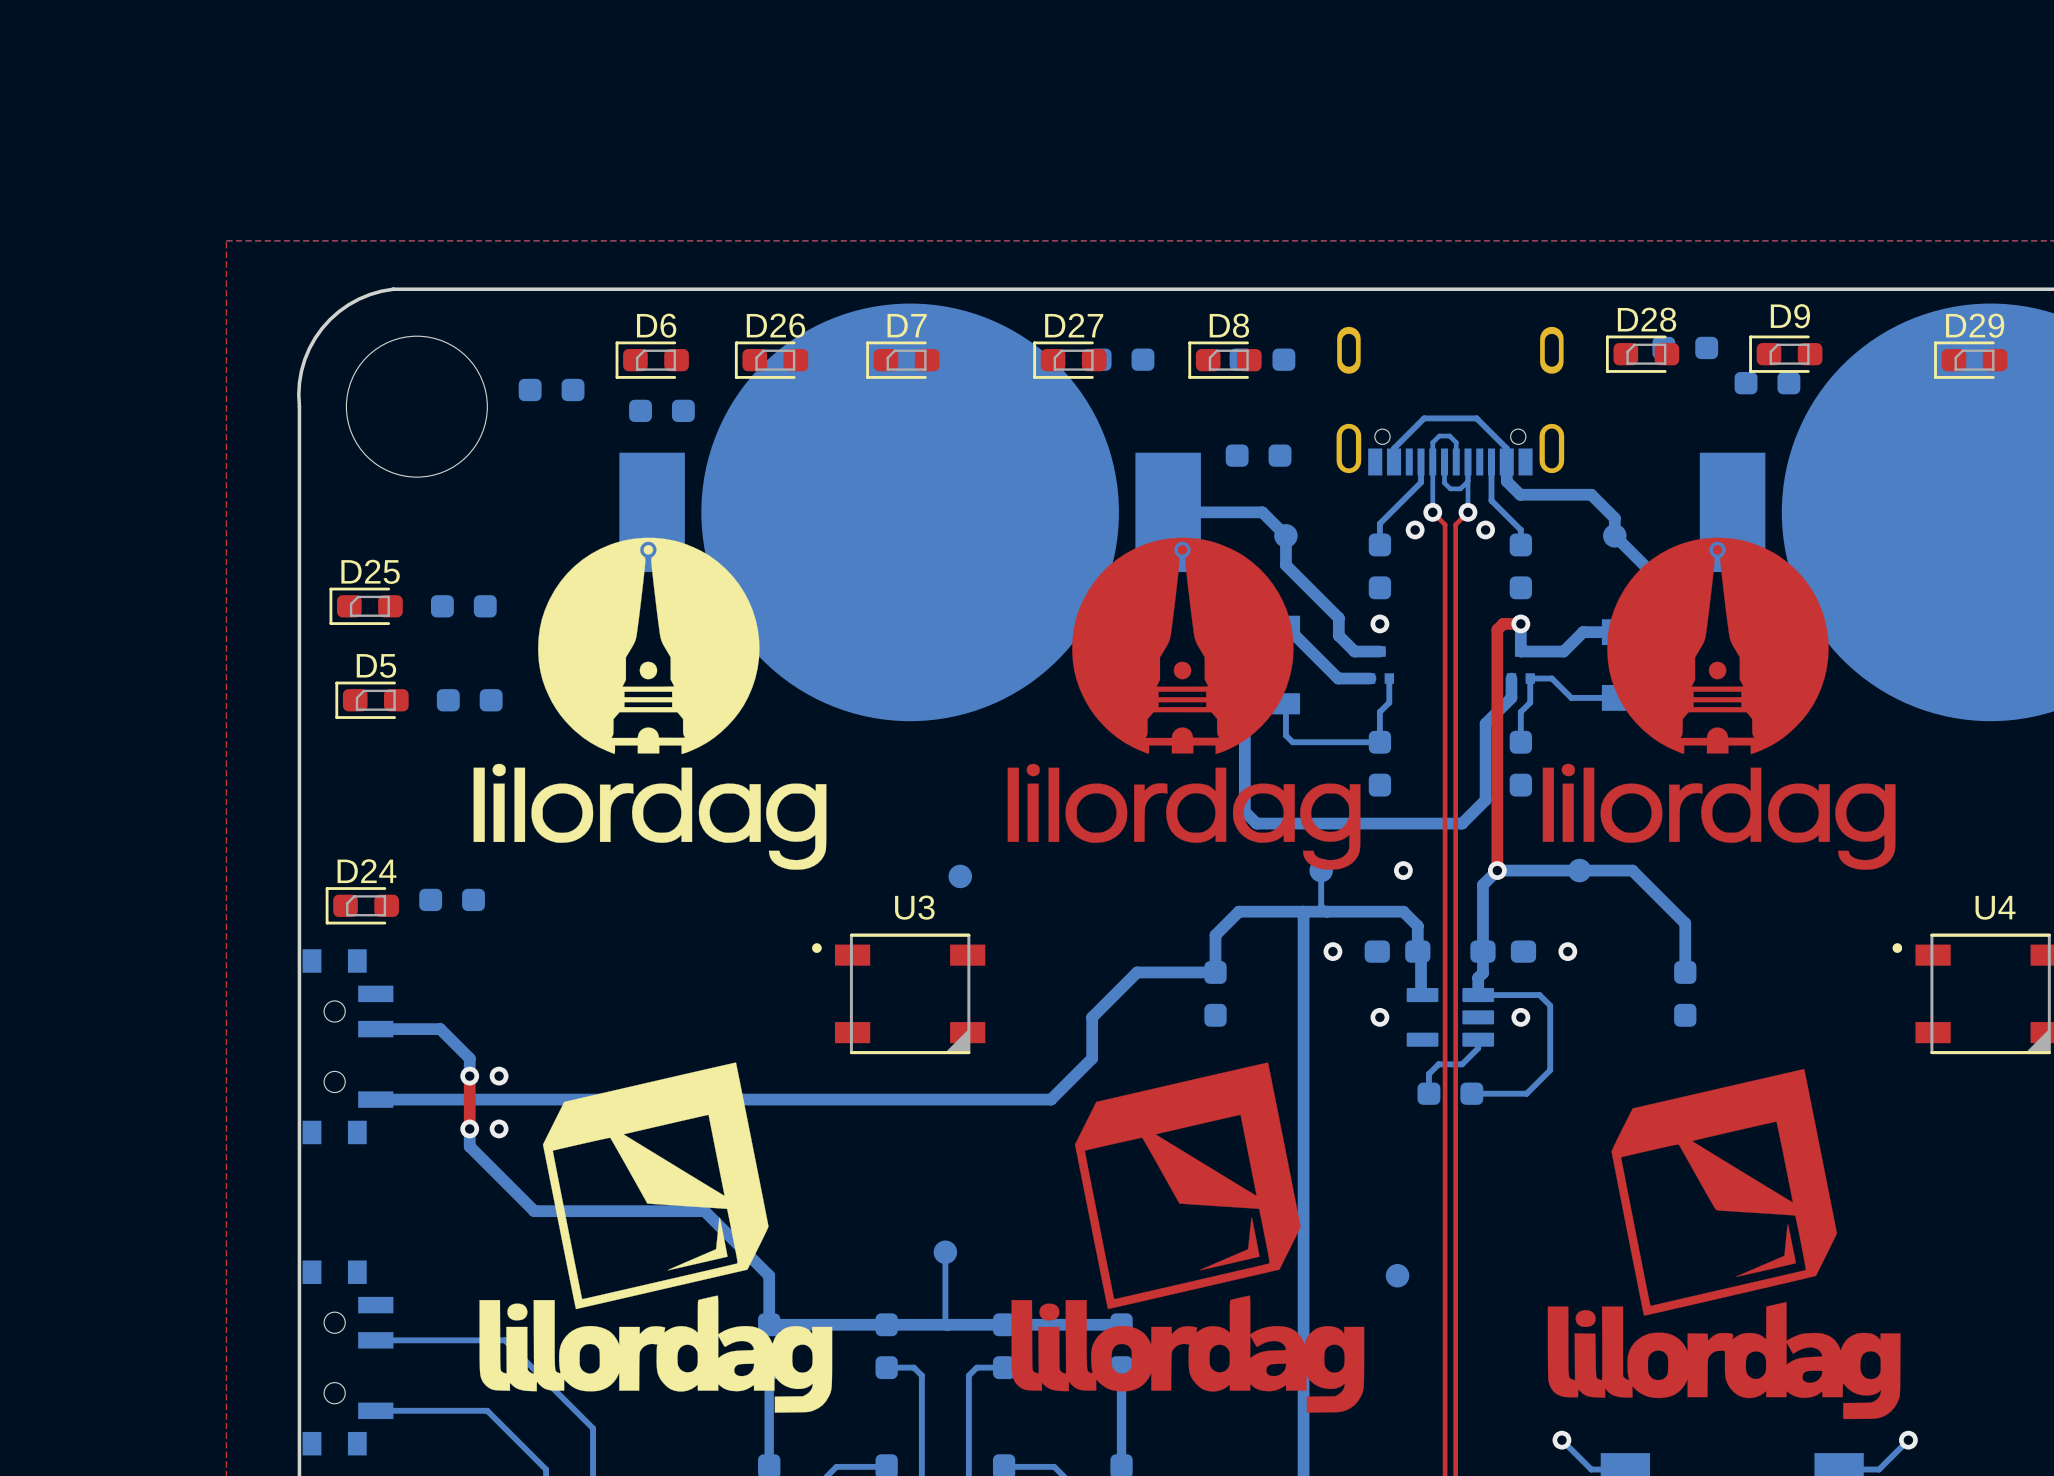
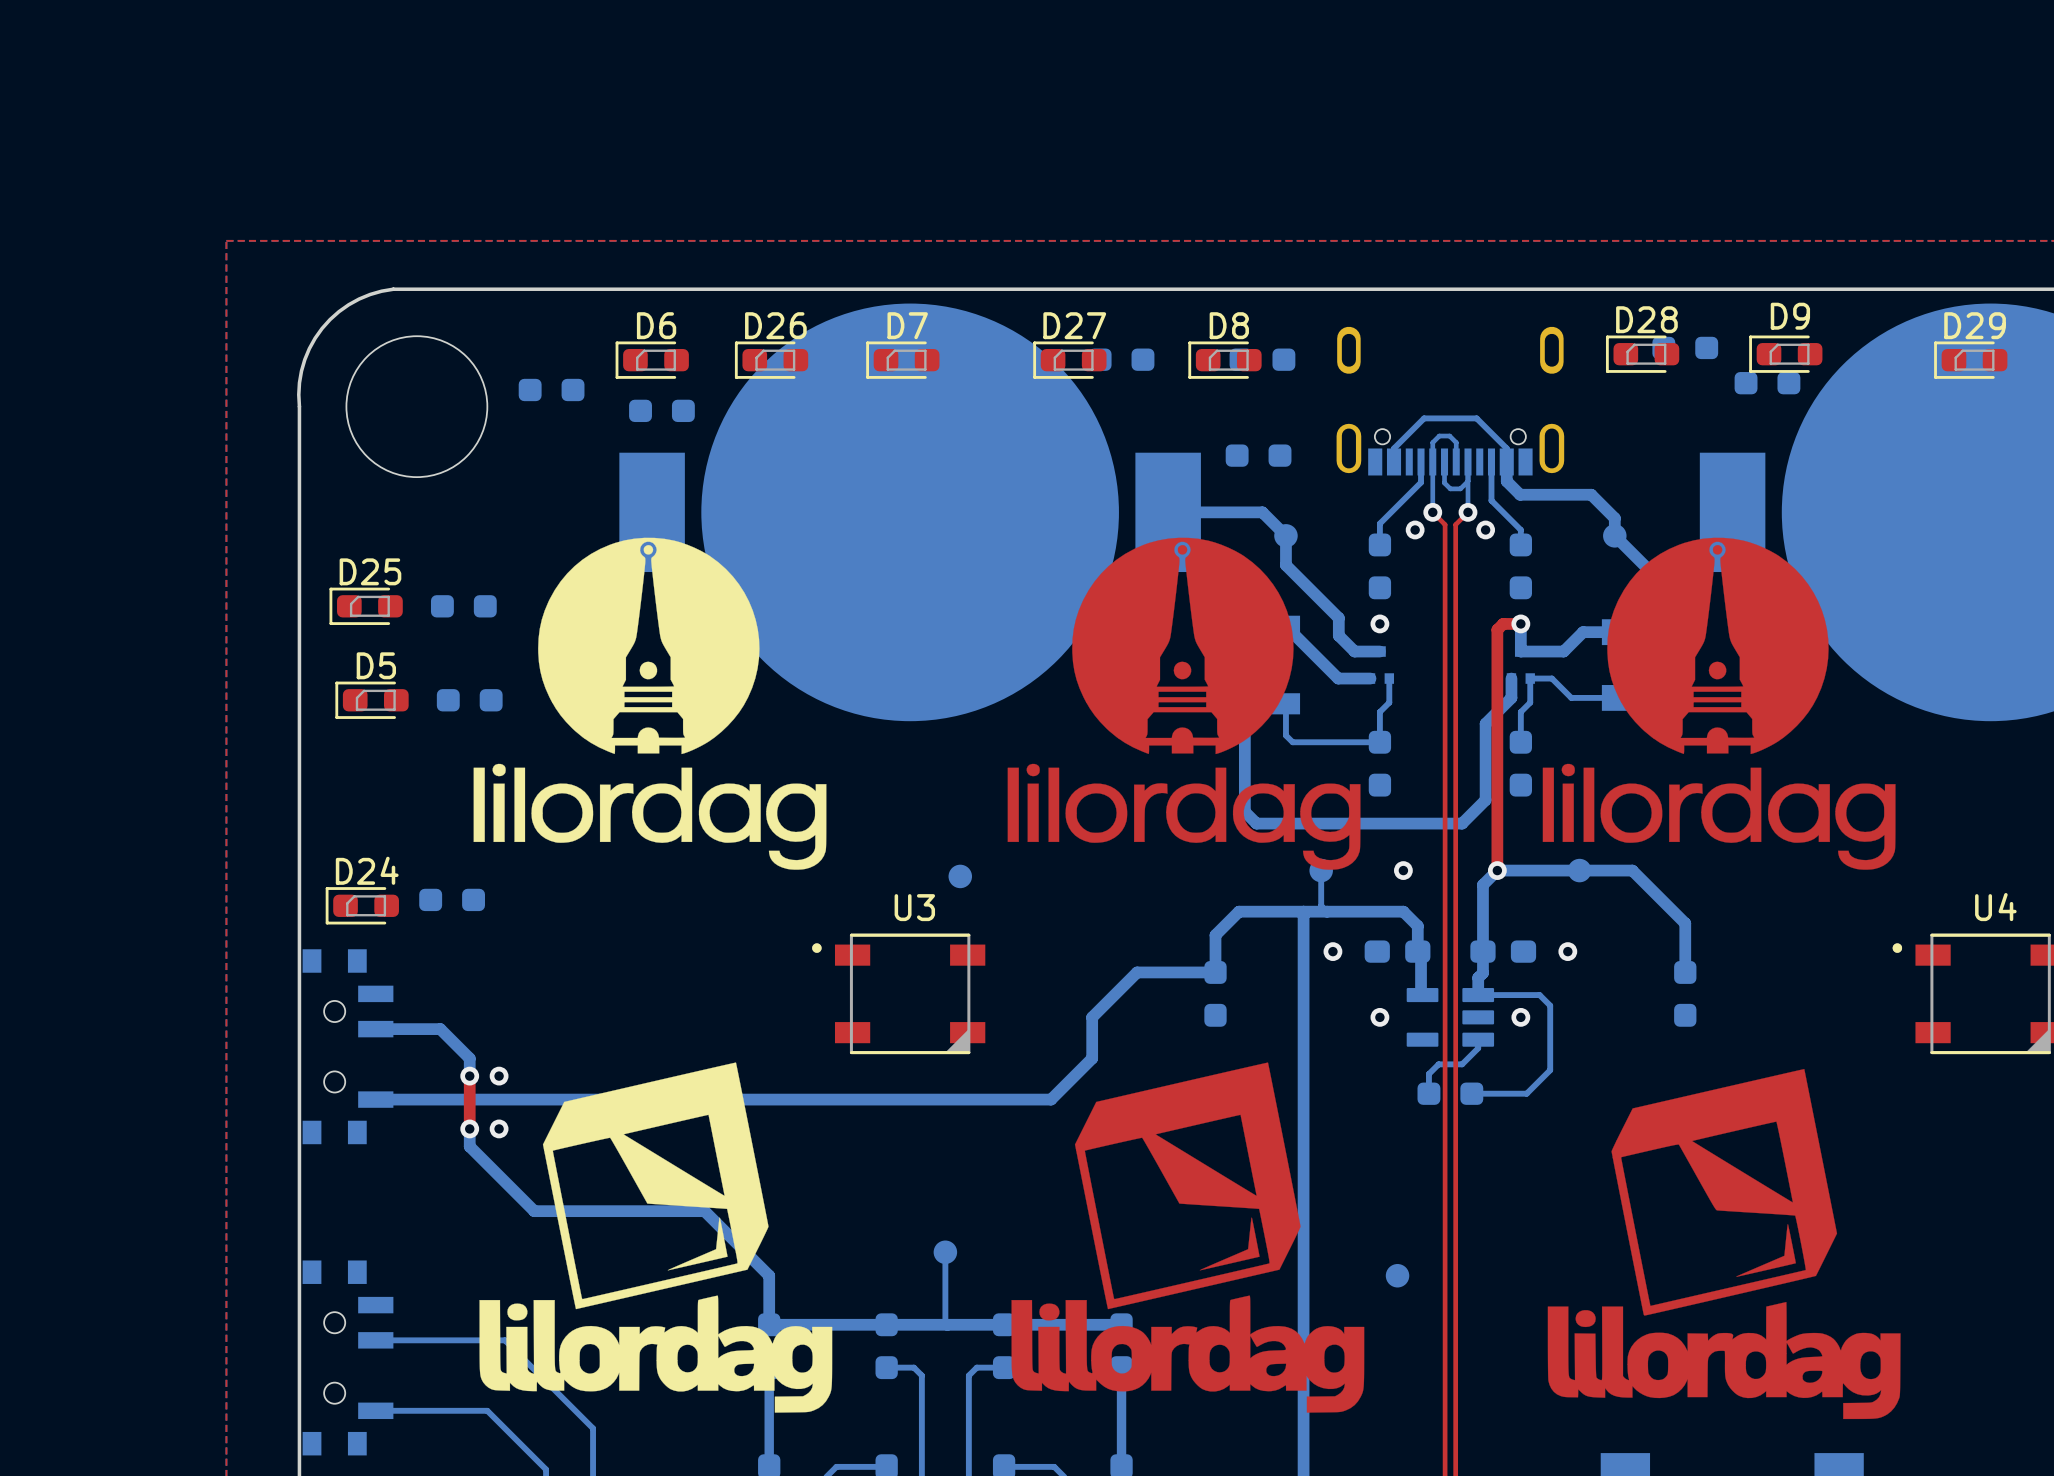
bottom track: (1561, 1440) (1591, 1469) (1625, 1469) -> none
via: (1561, 1440) -> none
bottom track: (1908, 1440) (1879, 1469) (1839, 1469) -> none
via: (1908, 1440) -> none

